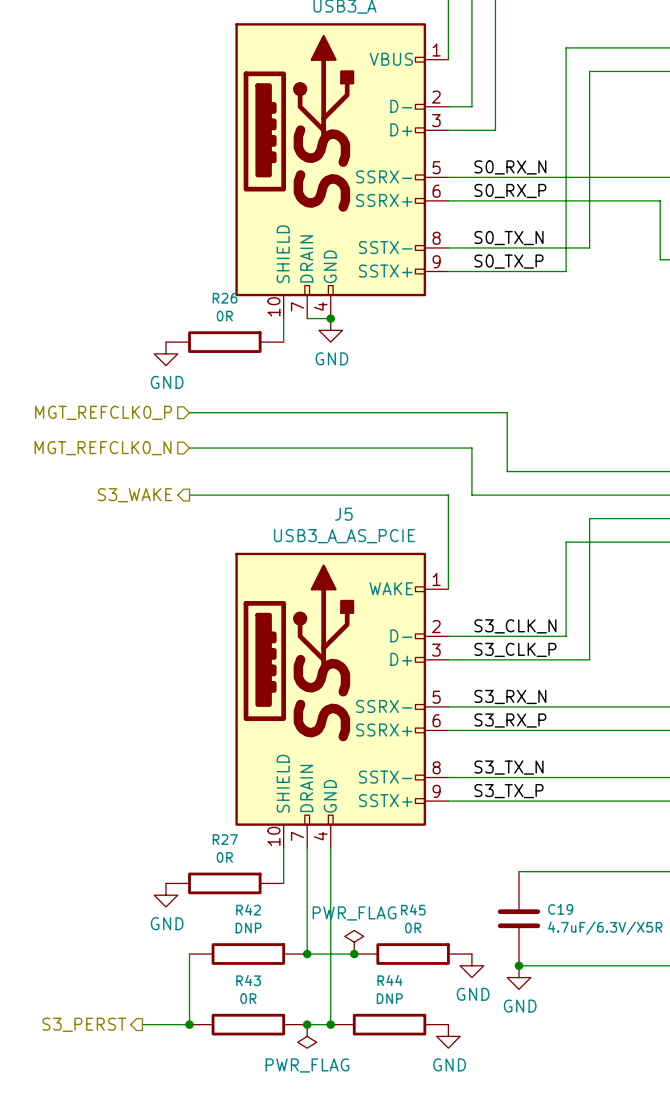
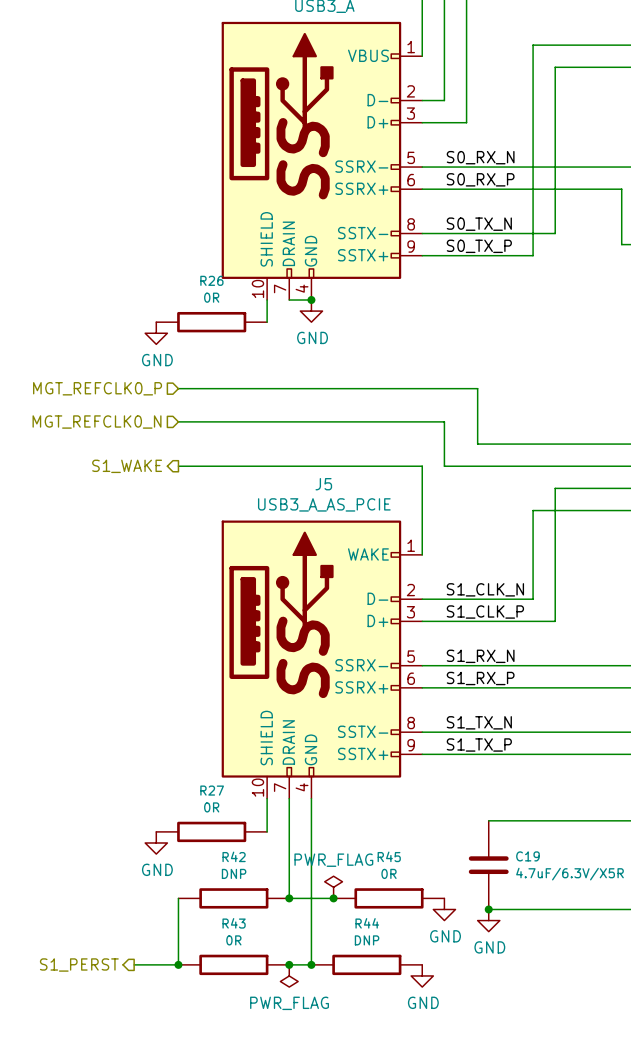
hierarchical label: S3_WAKE (134, 495) -> S1_WAKE (127, 466)
label: S3_CLK_N (515, 626) -> S1_CLK_N (485, 589)
label: S3_CLK_P (515, 649) -> S1_CLK_P (485, 612)
label: S3_RX_N (510, 696) -> S1_RX_N (480, 656)
label: S3_RX_P (510, 720) -> S1_RX_P (480, 678)
label: S3_TX_N (509, 767) -> S1_TX_N (479, 722)
label: S3_TX_P (509, 791) -> S1_TX_P (479, 744)
hierarchical label: S3_PERST (84, 1024) -> S1_PERST (79, 965)

